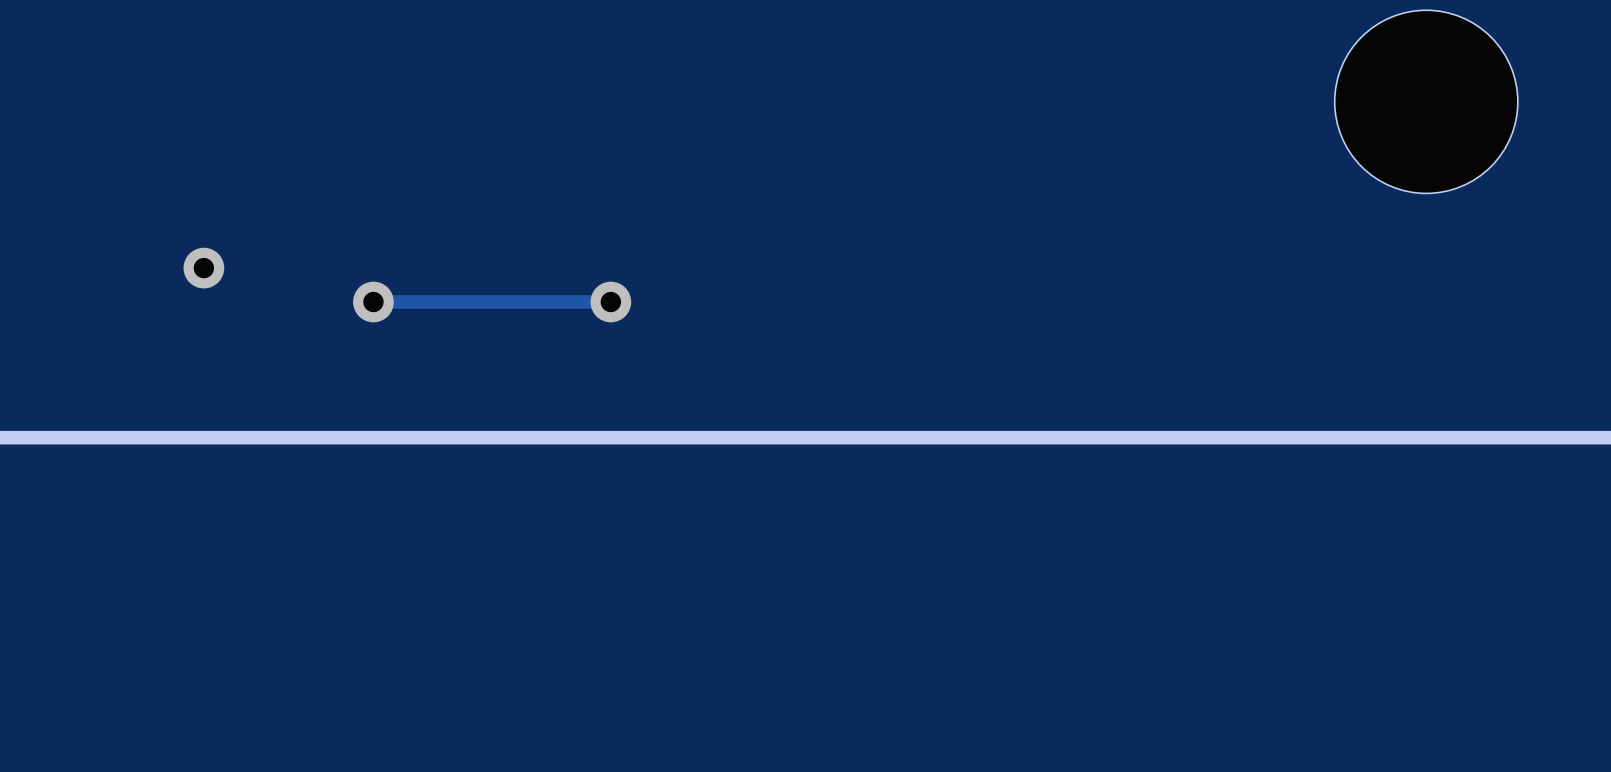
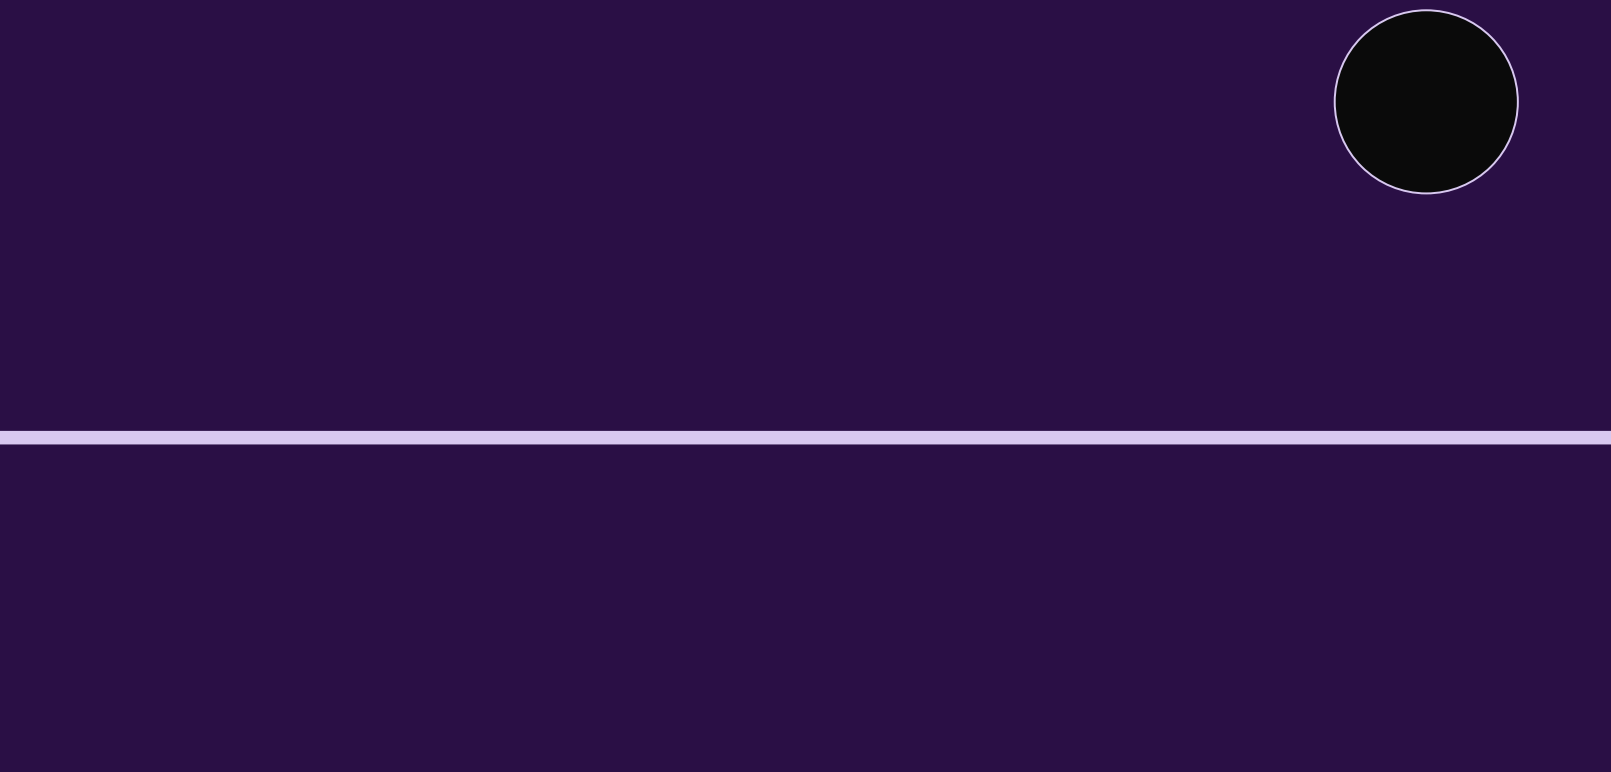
via: (203, 268) -> none
via: (373, 302) -> none
track: (610, 302) (373, 302) -> none
via: (610, 302) -> none

